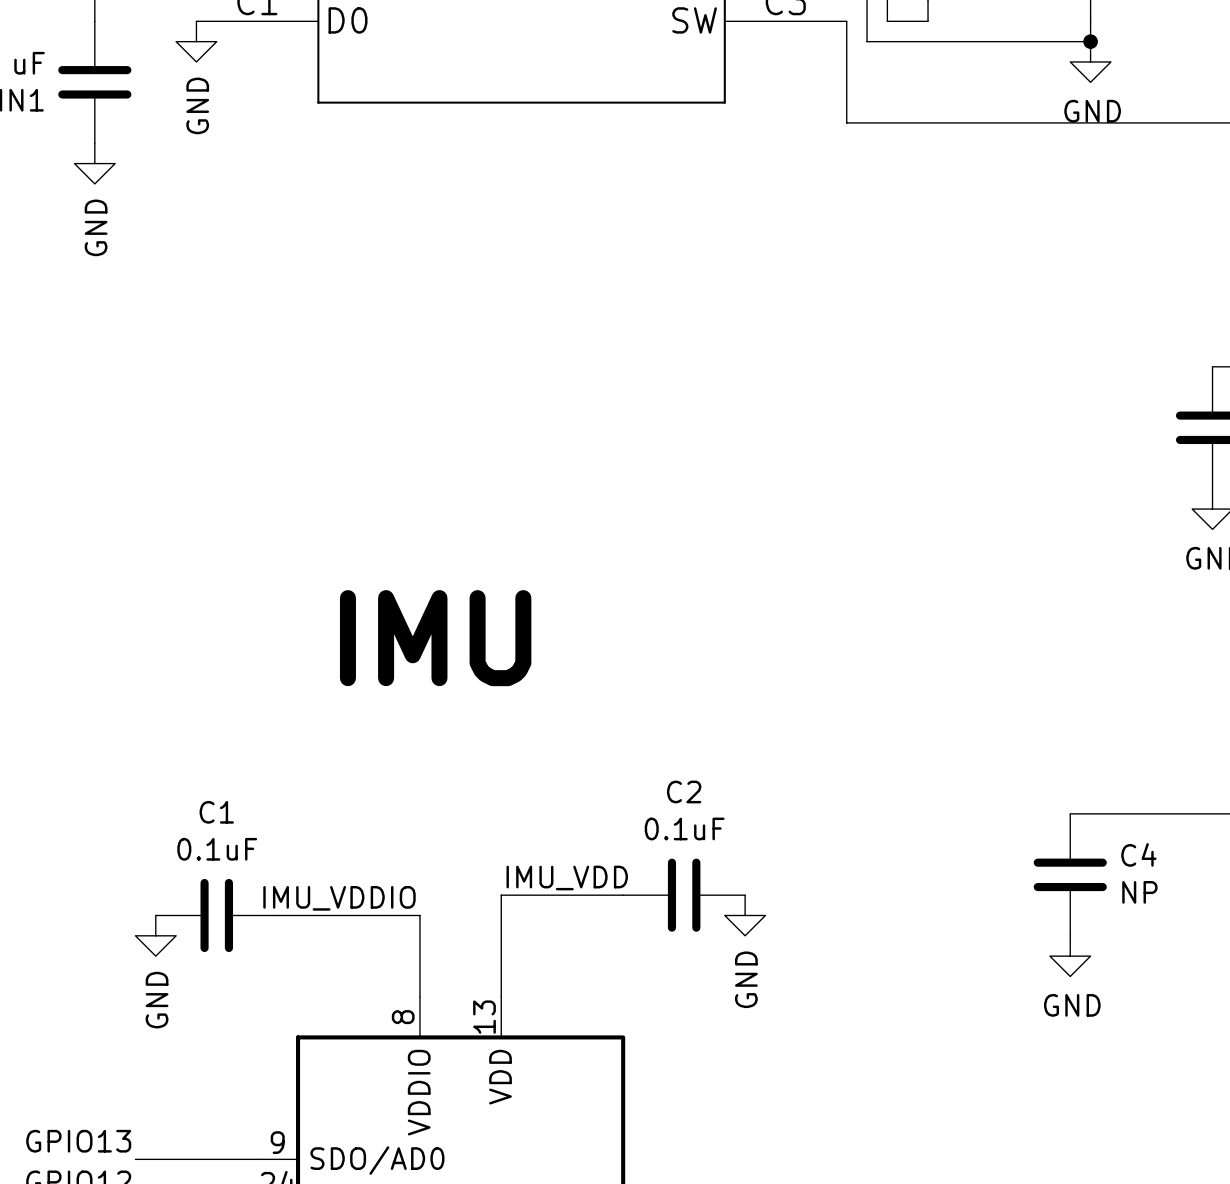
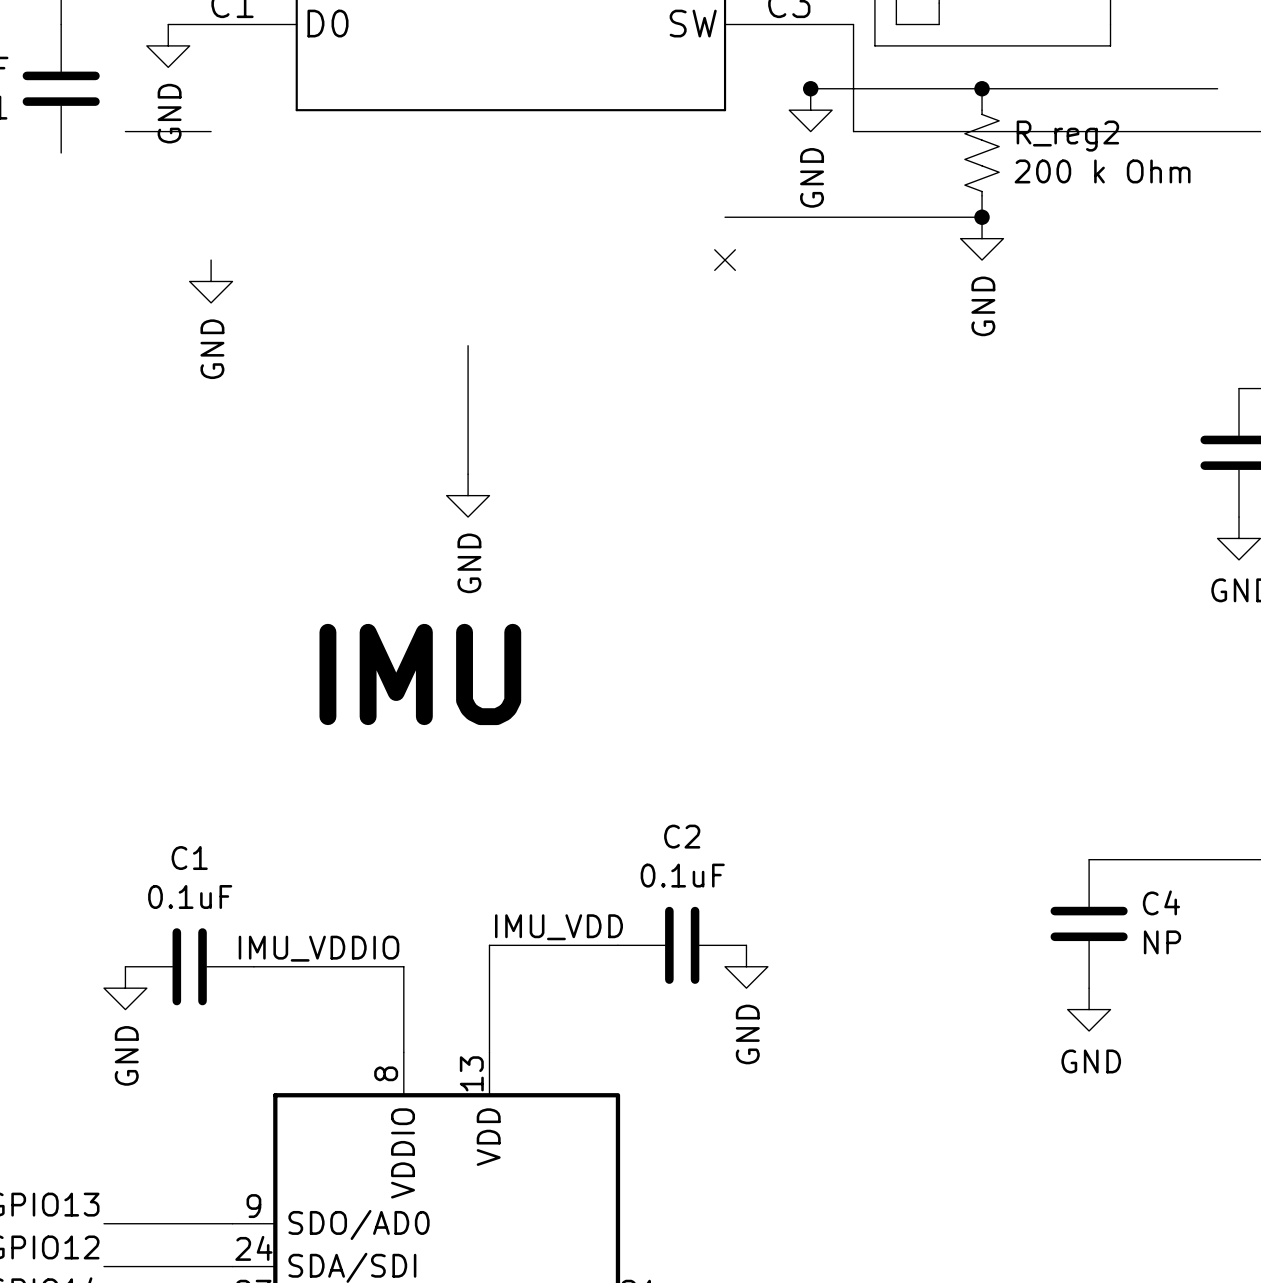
junction: (1090, 41) -> none
power symbol: GND (1090, 61) -> none
wire: none -> (810, 88) (1217, 88)
junction: none -> (810, 88)
junction: none -> (982, 88)
power symbol: none -> GND (810, 110)
wire: none -> (125, 131) (211, 131)
R_reg2: none -> 200 k Ohm (982, 152)
power symbol position: GND (94, 163) -> GND (211, 281)
wire: none -> (725, 217) (982, 217)
junction: none -> (982, 217)
power symbol: none -> GND (982, 238)
no-connect mark: none -> (725, 260)
wire: none -> (468, 345) (468, 474)
power symbol: none -> GND (468, 495)

